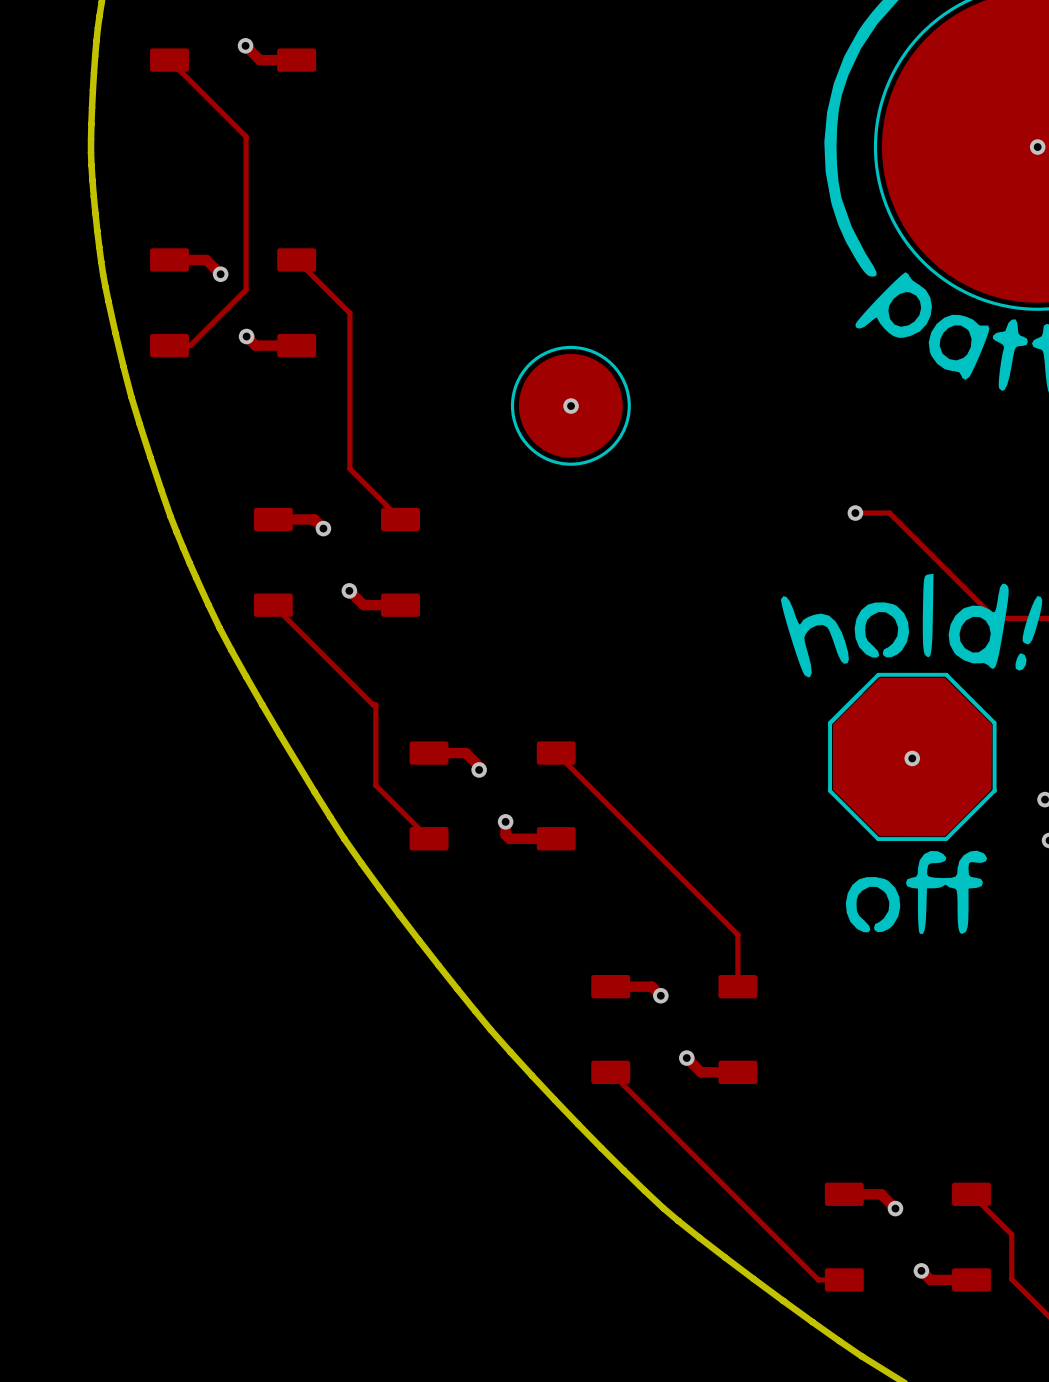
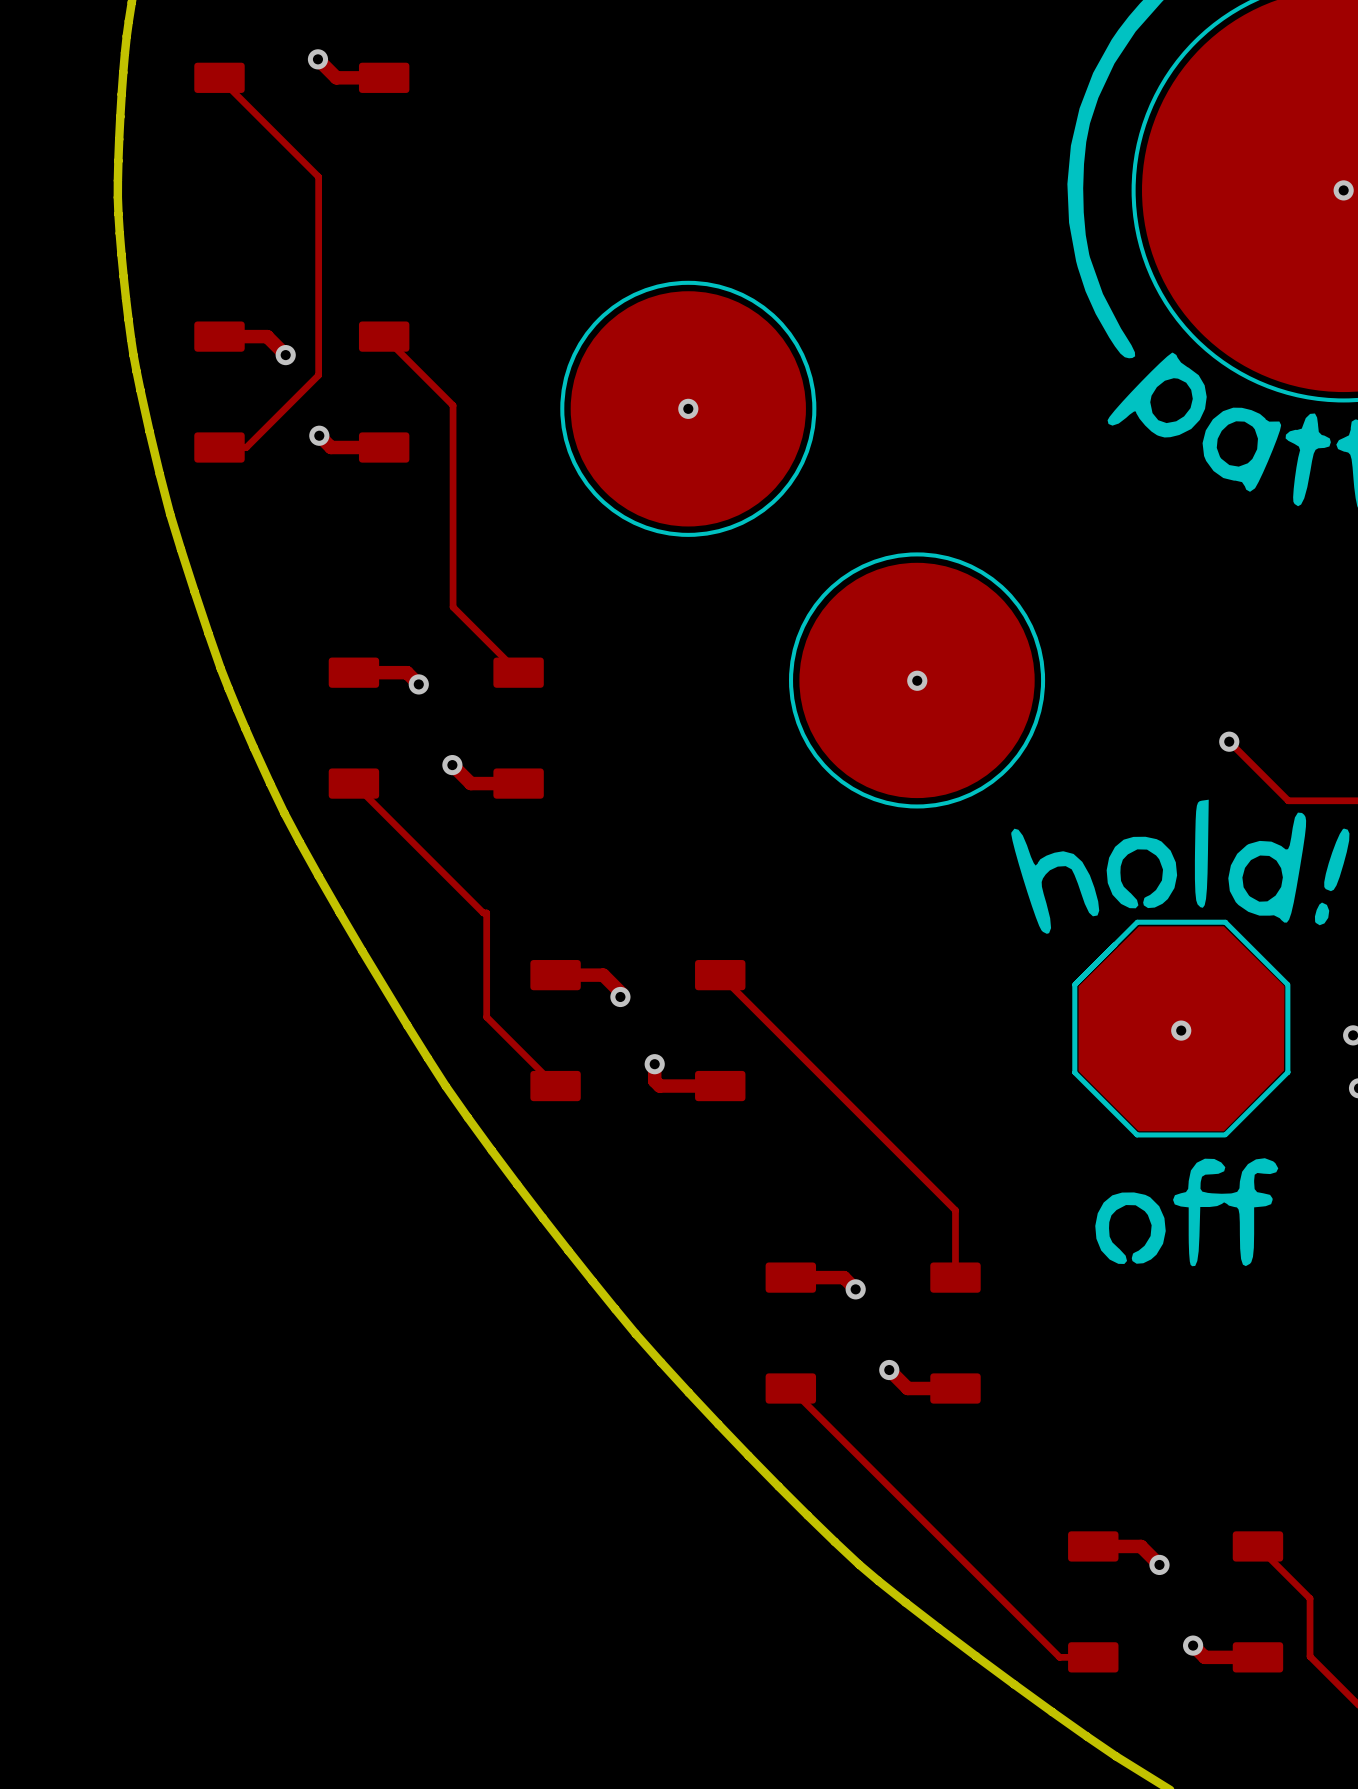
part: none -> (688, 408)
via: none -> (688, 408)
part: (570, 405) -> none
via: (571, 406) -> none
track: (855, 513) (889, 513) (949, 572) -> none
via: (855, 513) -> none
part: none -> (917, 680)
via: none -> (917, 680)
via: none -> (1229, 741)
drawing position: (911, 753) -> (1180, 1032)
part position: (912, 756) -> (1181, 1028)
via position: (912, 758) -> (1181, 1030)

